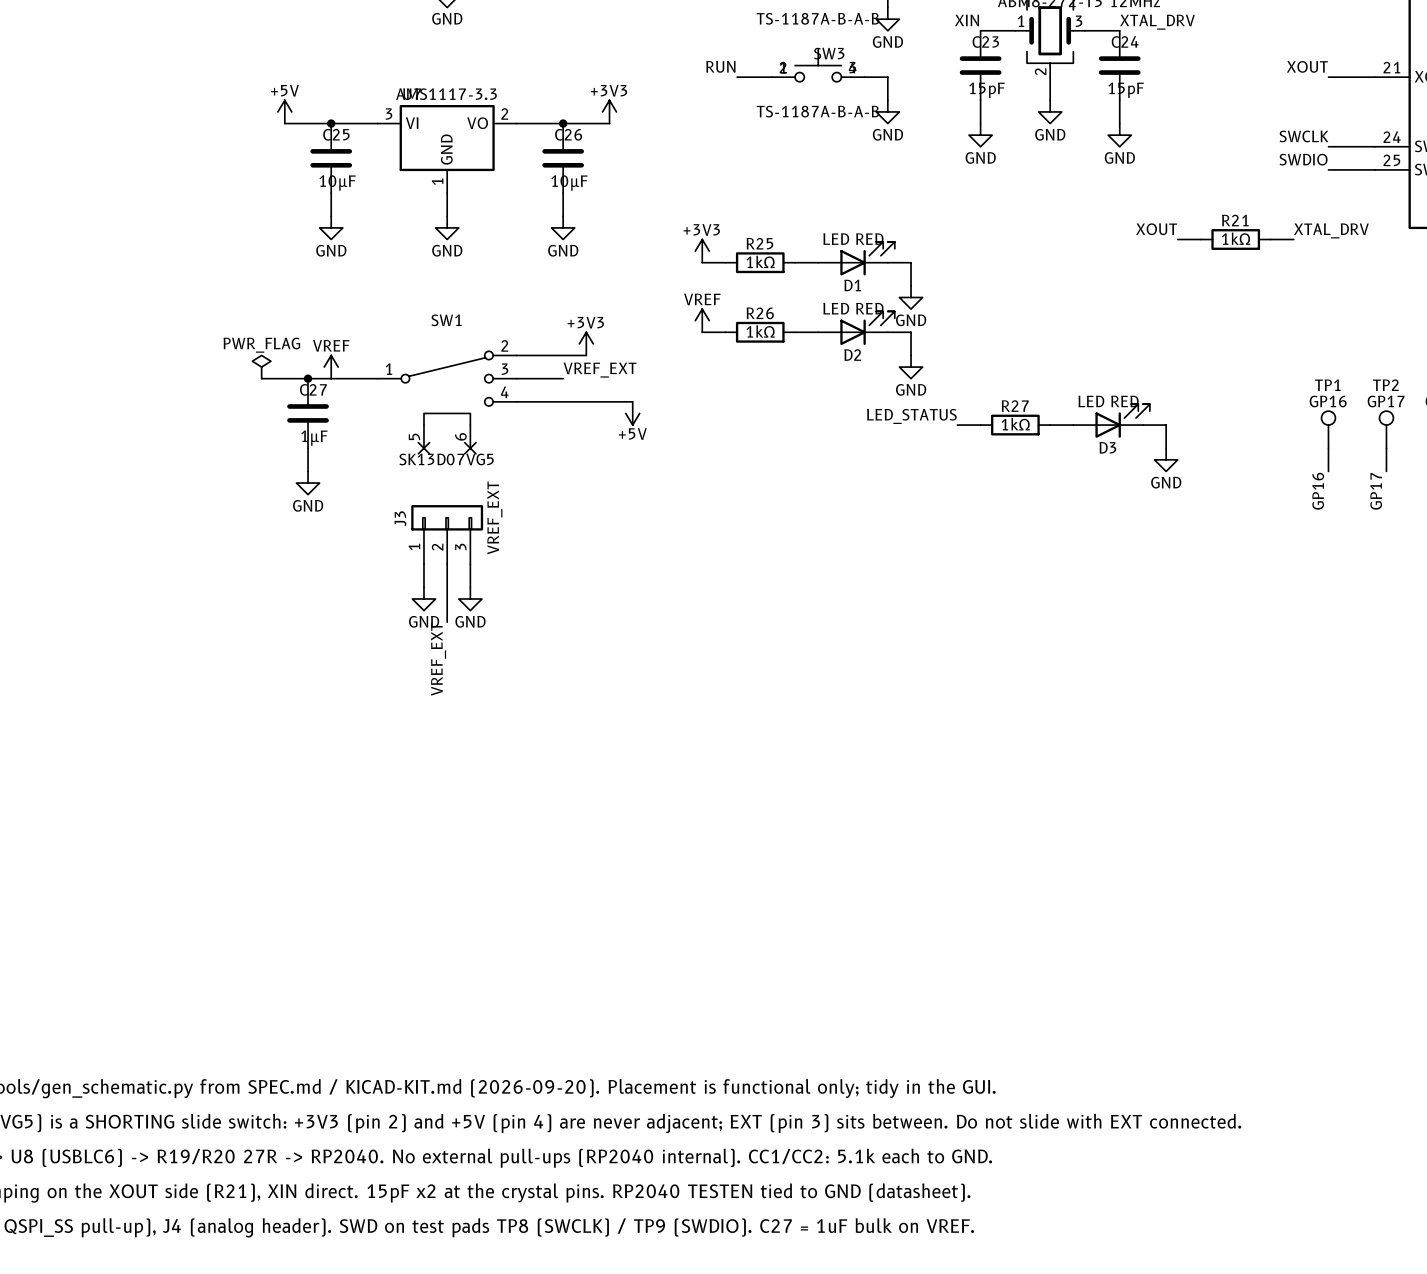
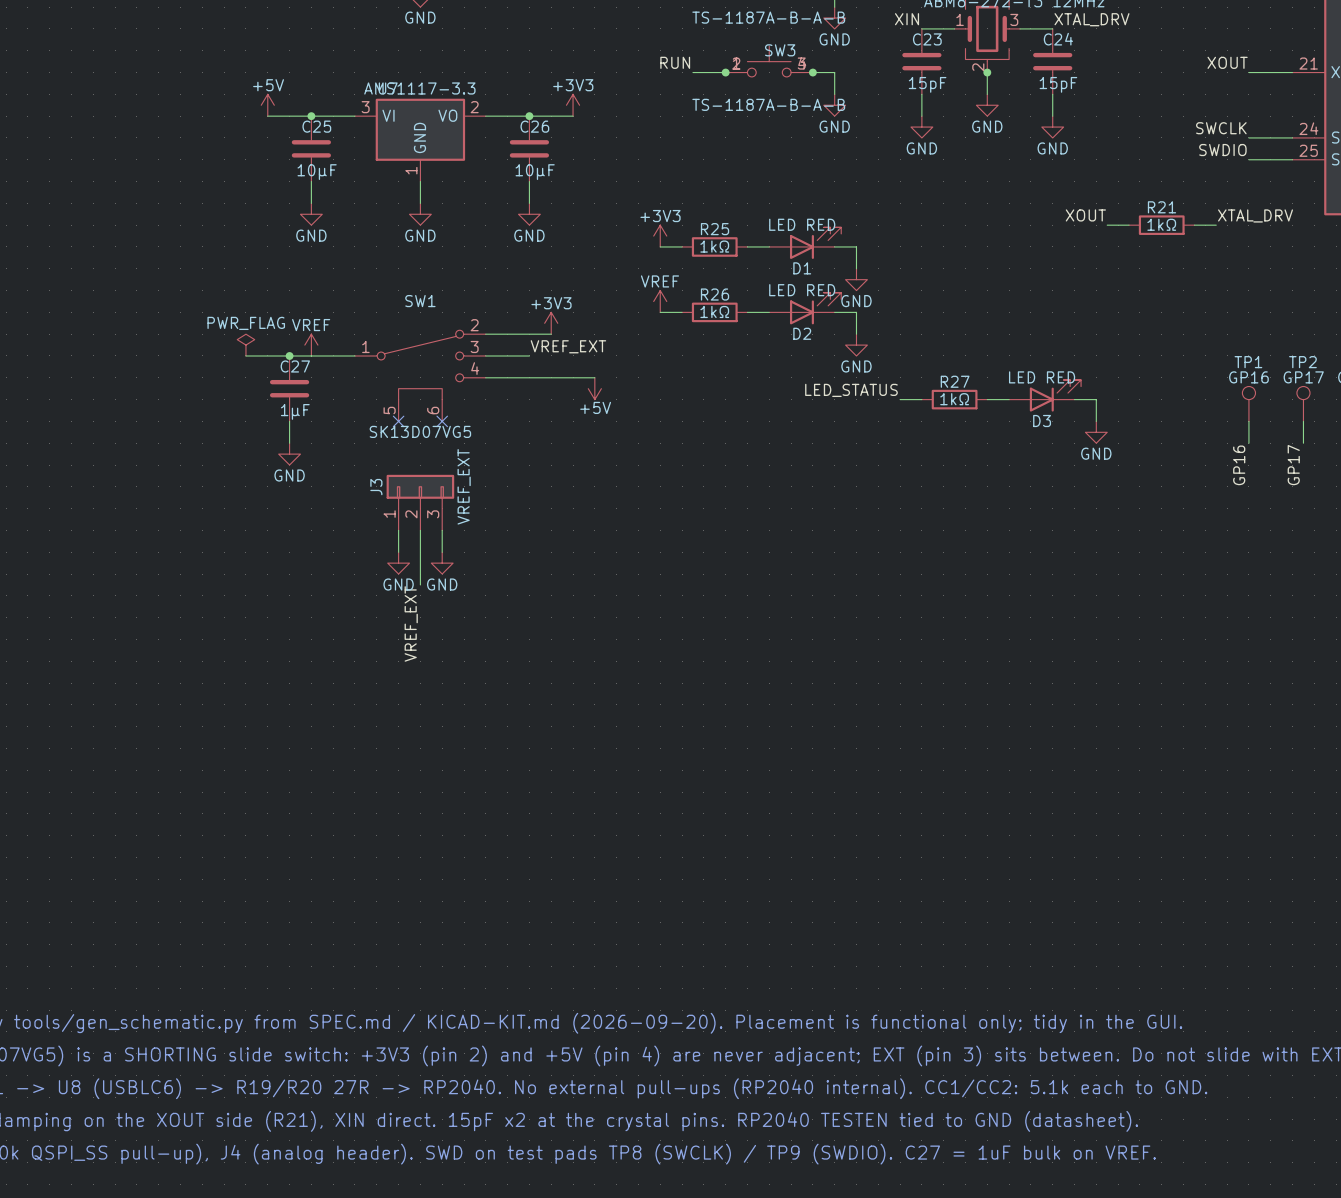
junction: none -> (725, 72)
junction: none -> (812, 72)
junction: none -> (987, 72)

